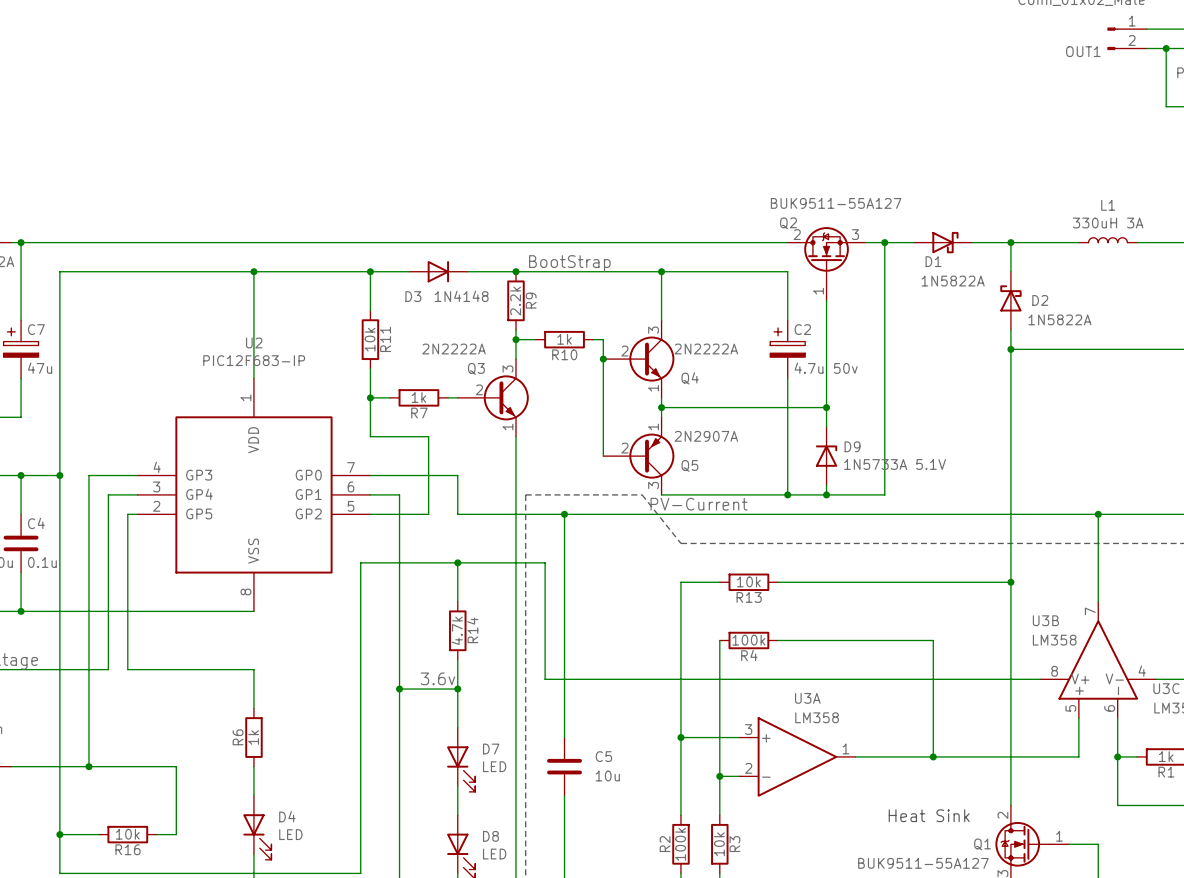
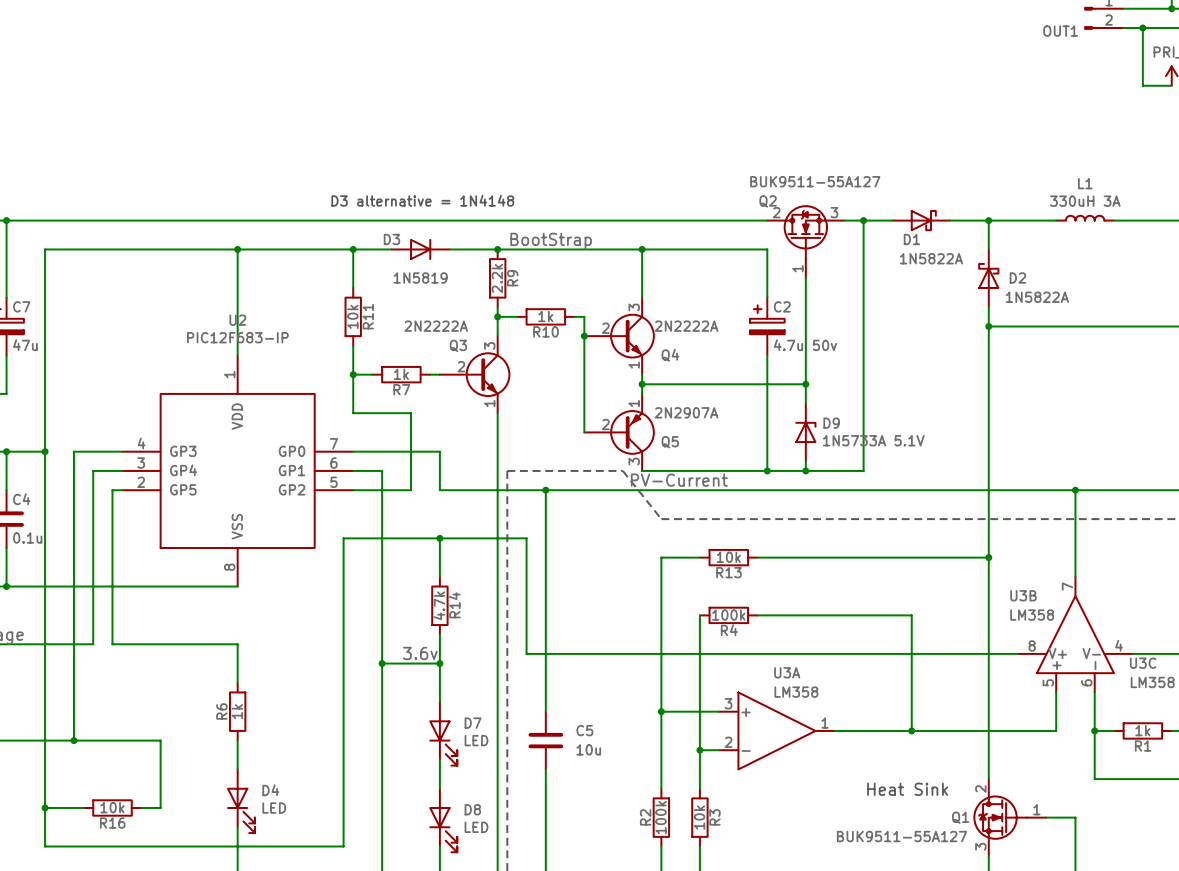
text: none -> D3 alternative = 1N4148 (422, 200)
D3 name position: D3 (413, 296) -> D3 (391, 239)
D3 value: 1N4148 (461, 296) -> 1N5819 (420, 278)

